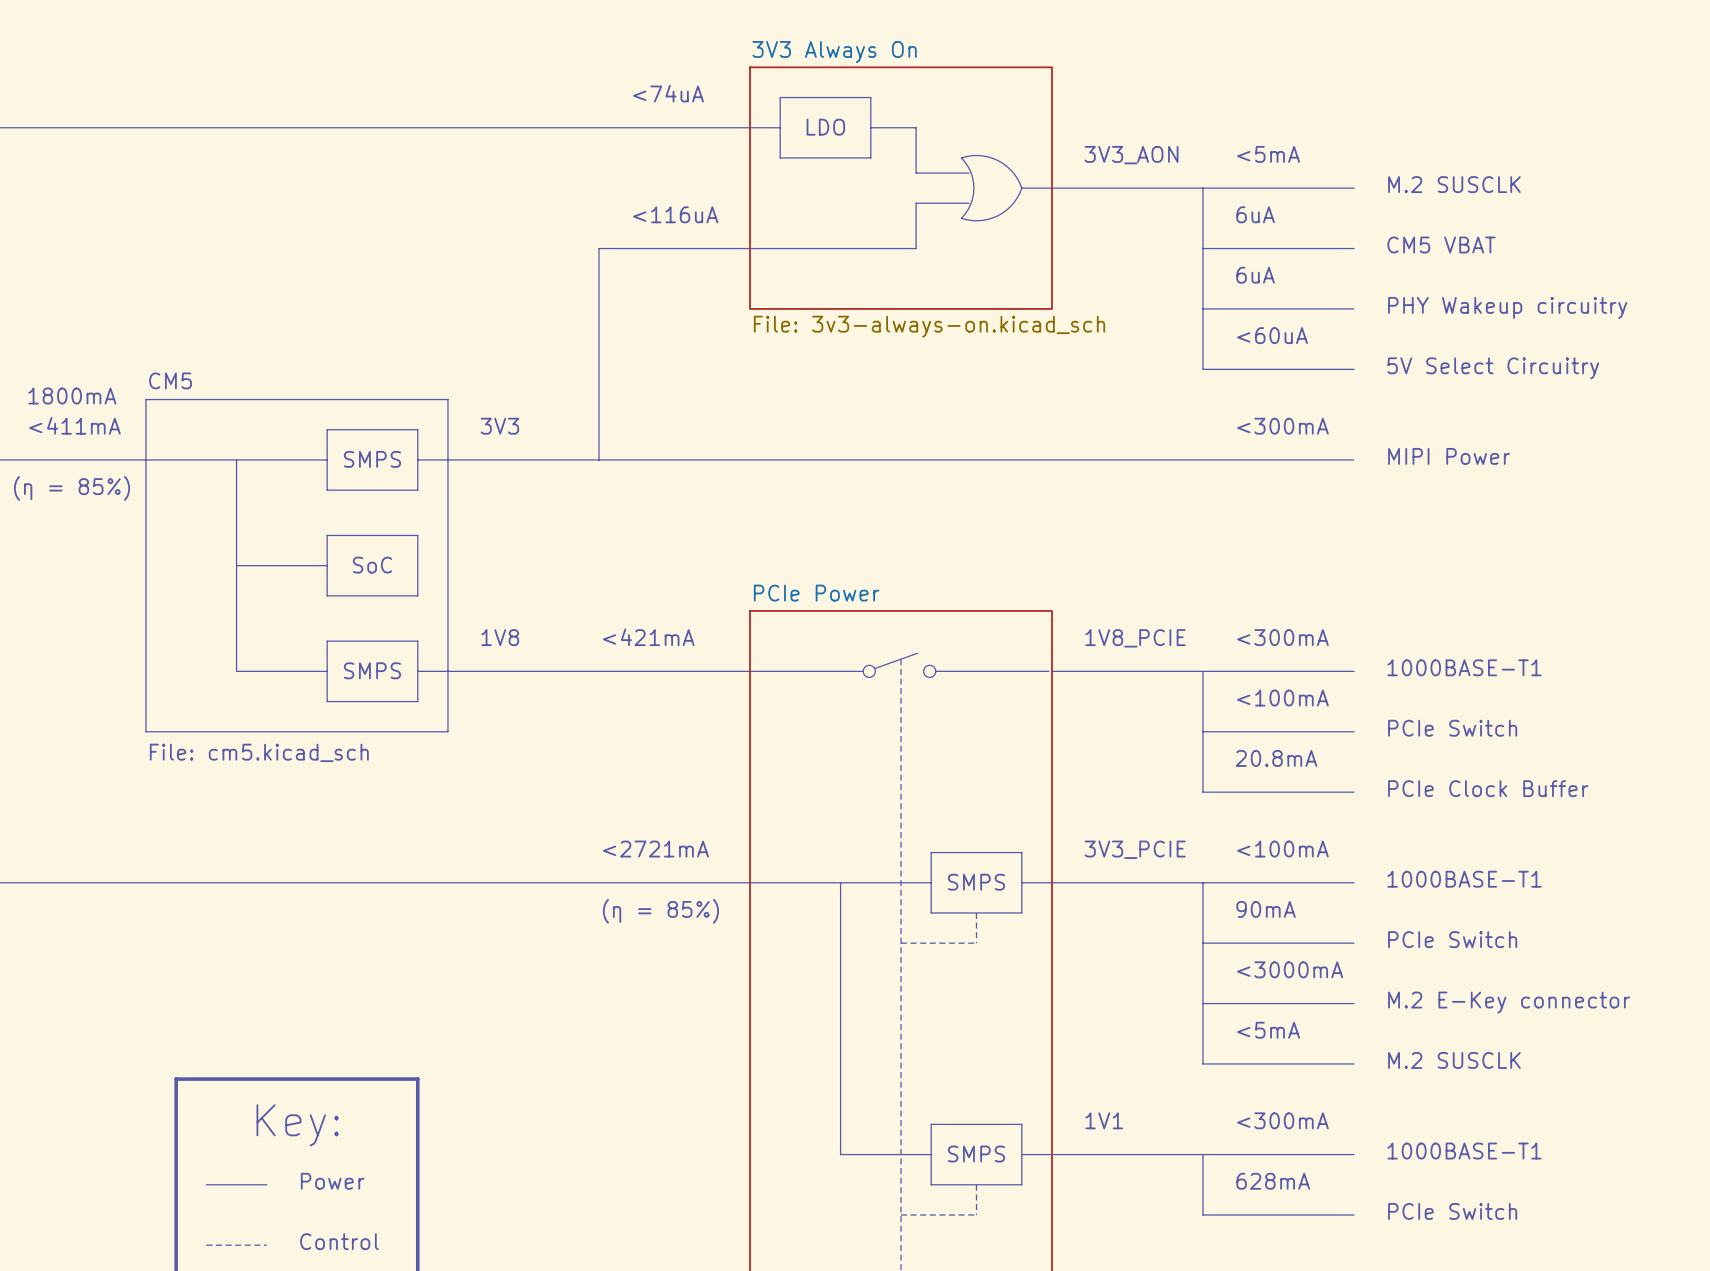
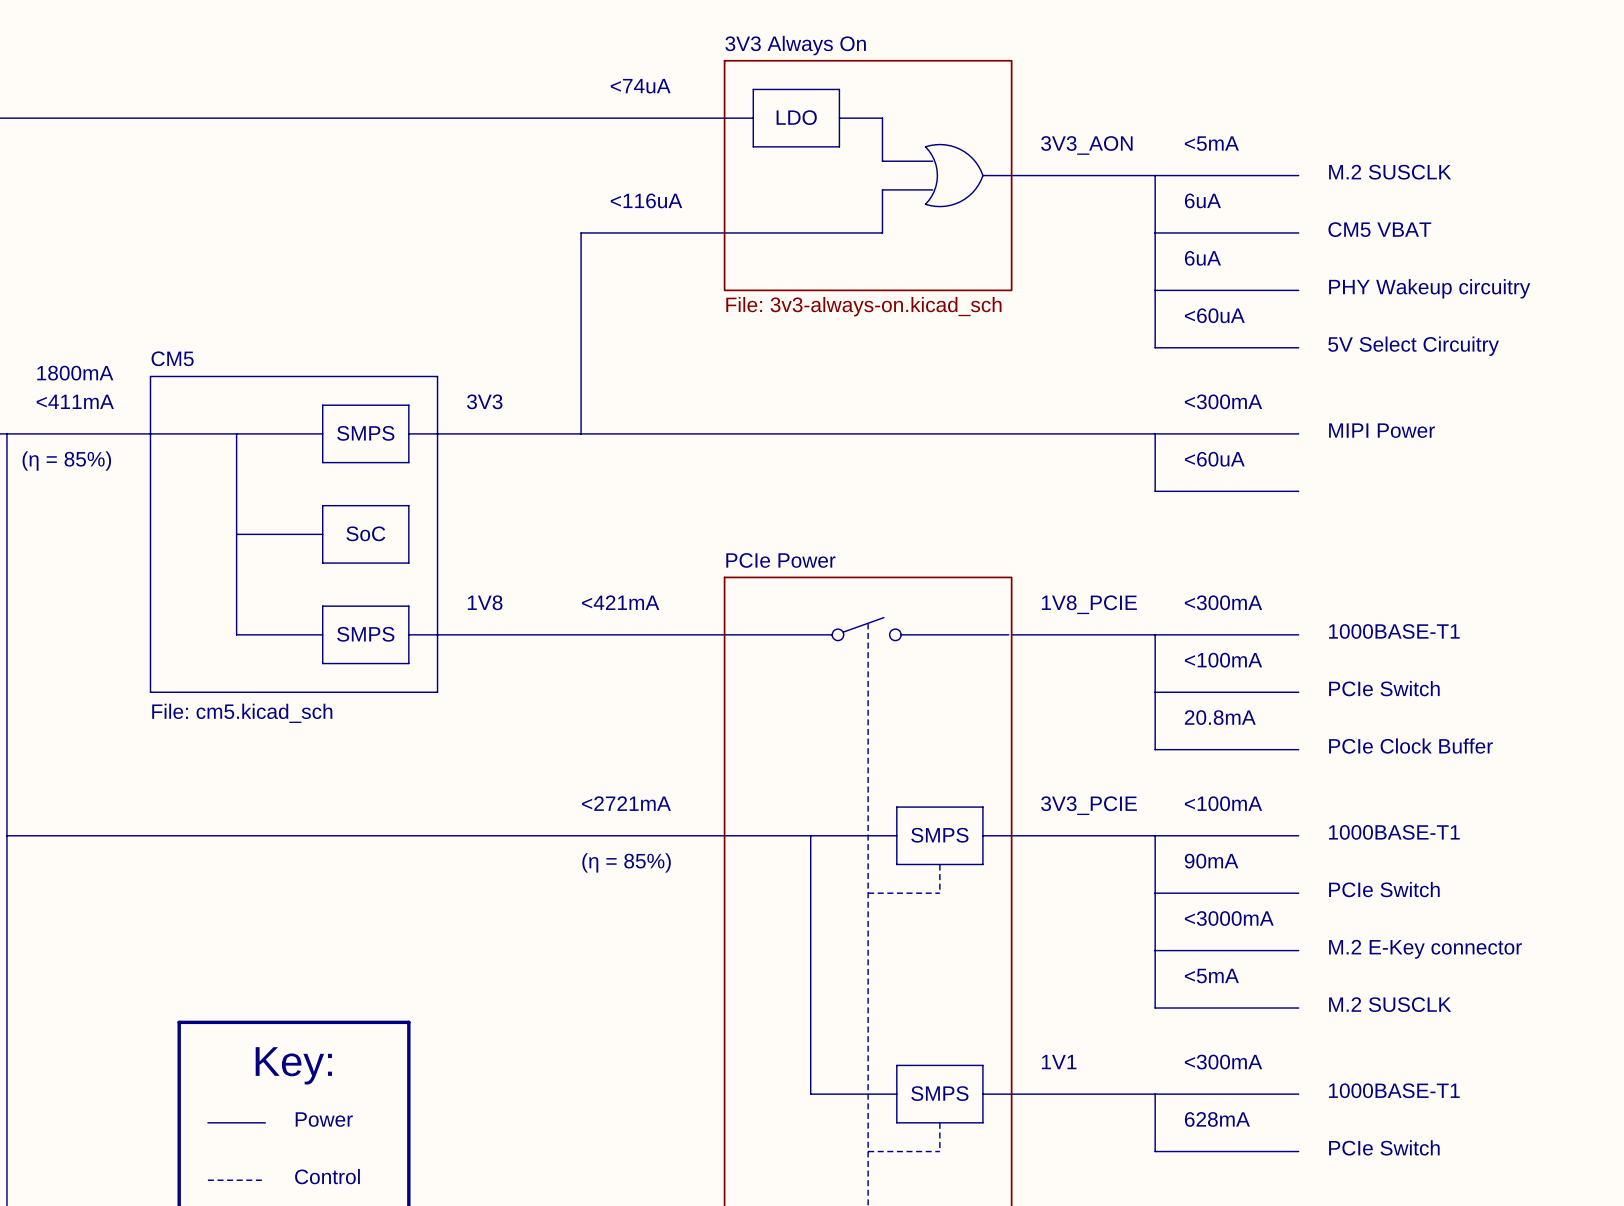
line: none -> (1155, 433) (1155, 491) (1298, 491)
text: none -> <60uA (1214, 459)

